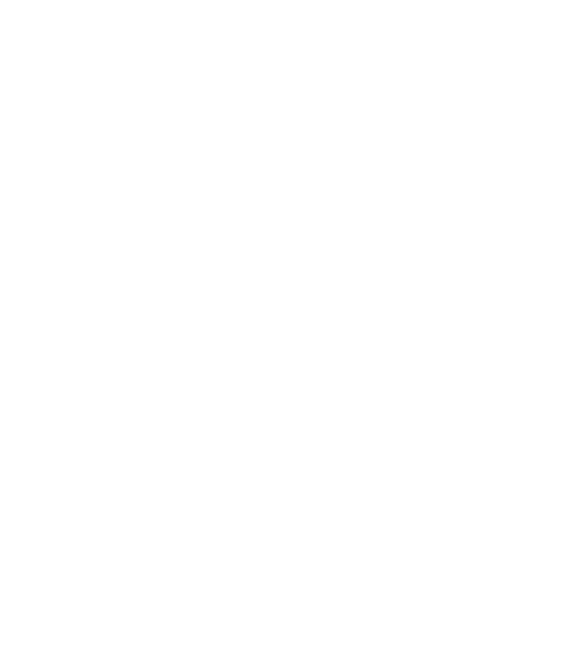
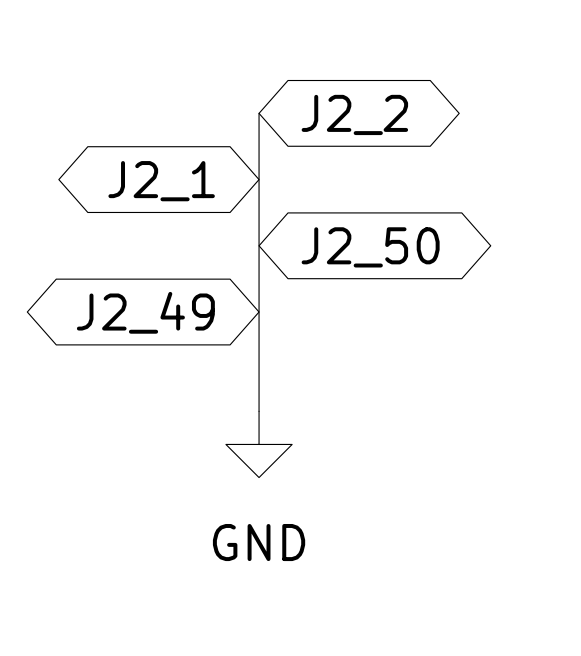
wire: none -> (259, 113) (259, 411)
global label: none -> J2_2 (354, 114)
global label: none -> J2_1 (161, 181)
global label: none -> J2_50 (370, 247)
global label: none -> J2_49 (145, 312)
power symbol: none -> GND (259, 444)

